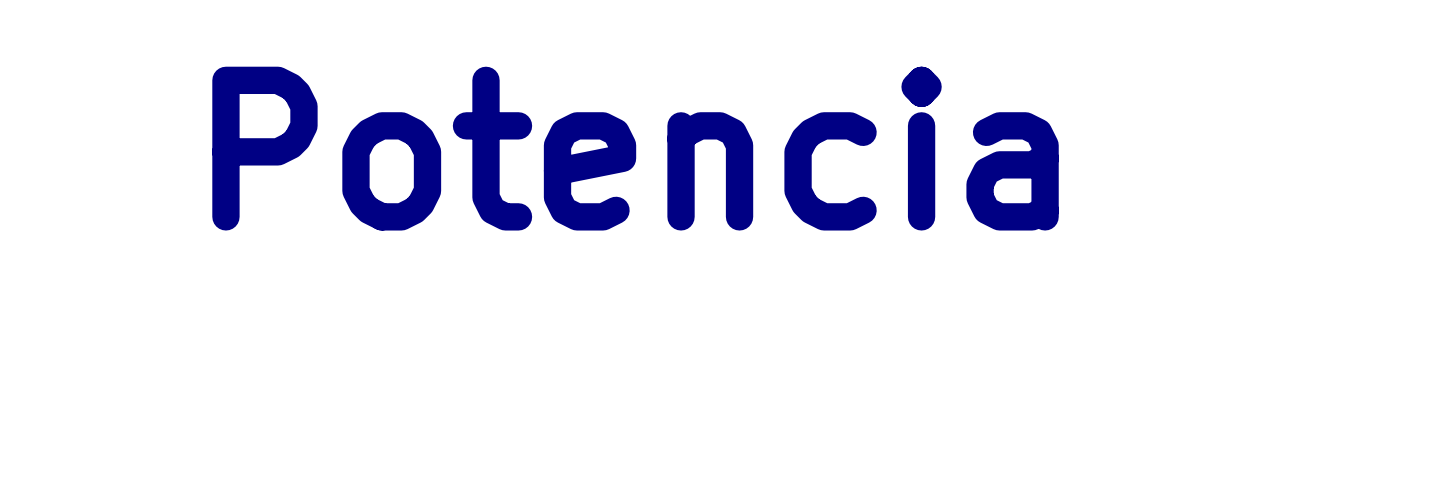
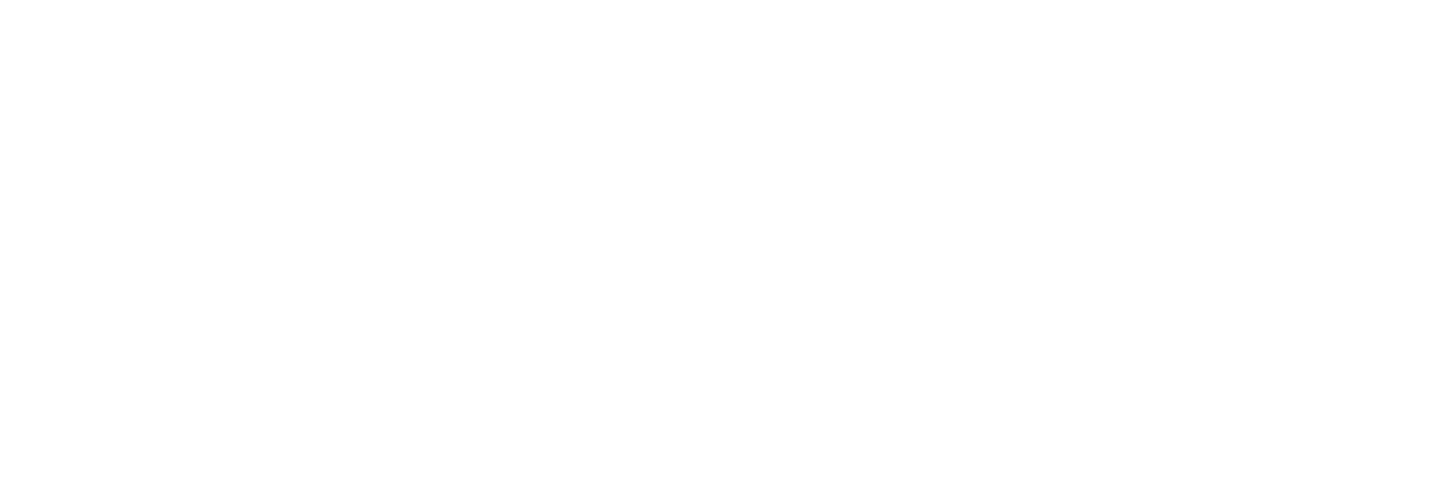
text: Potencia (635, 148) -> none

